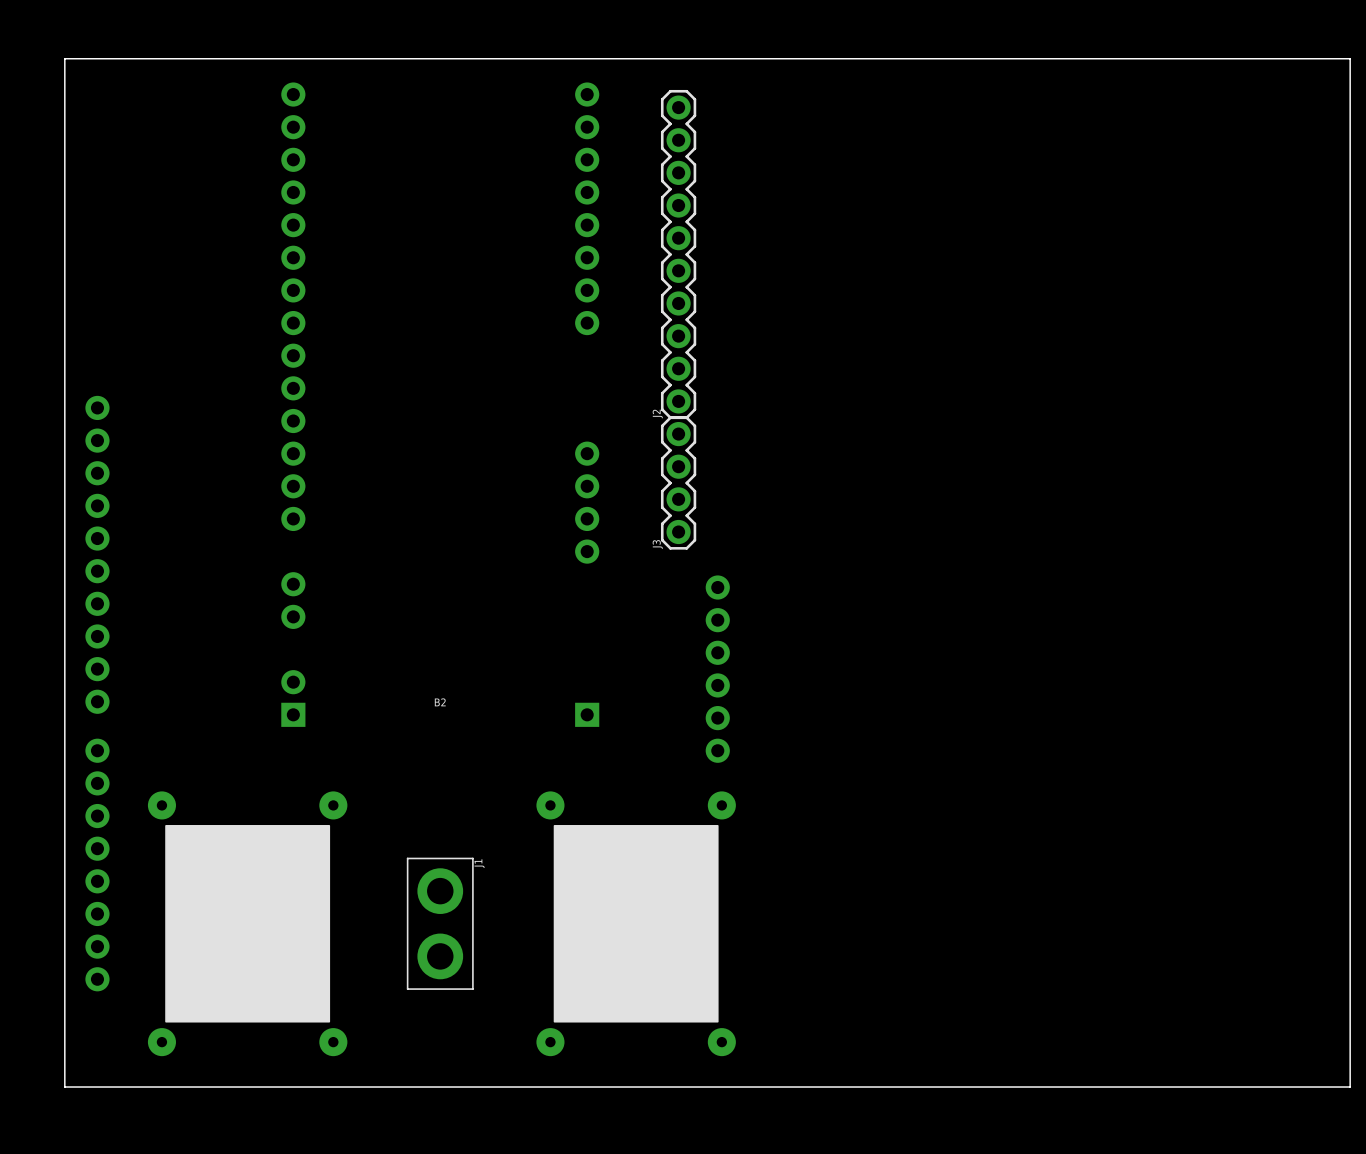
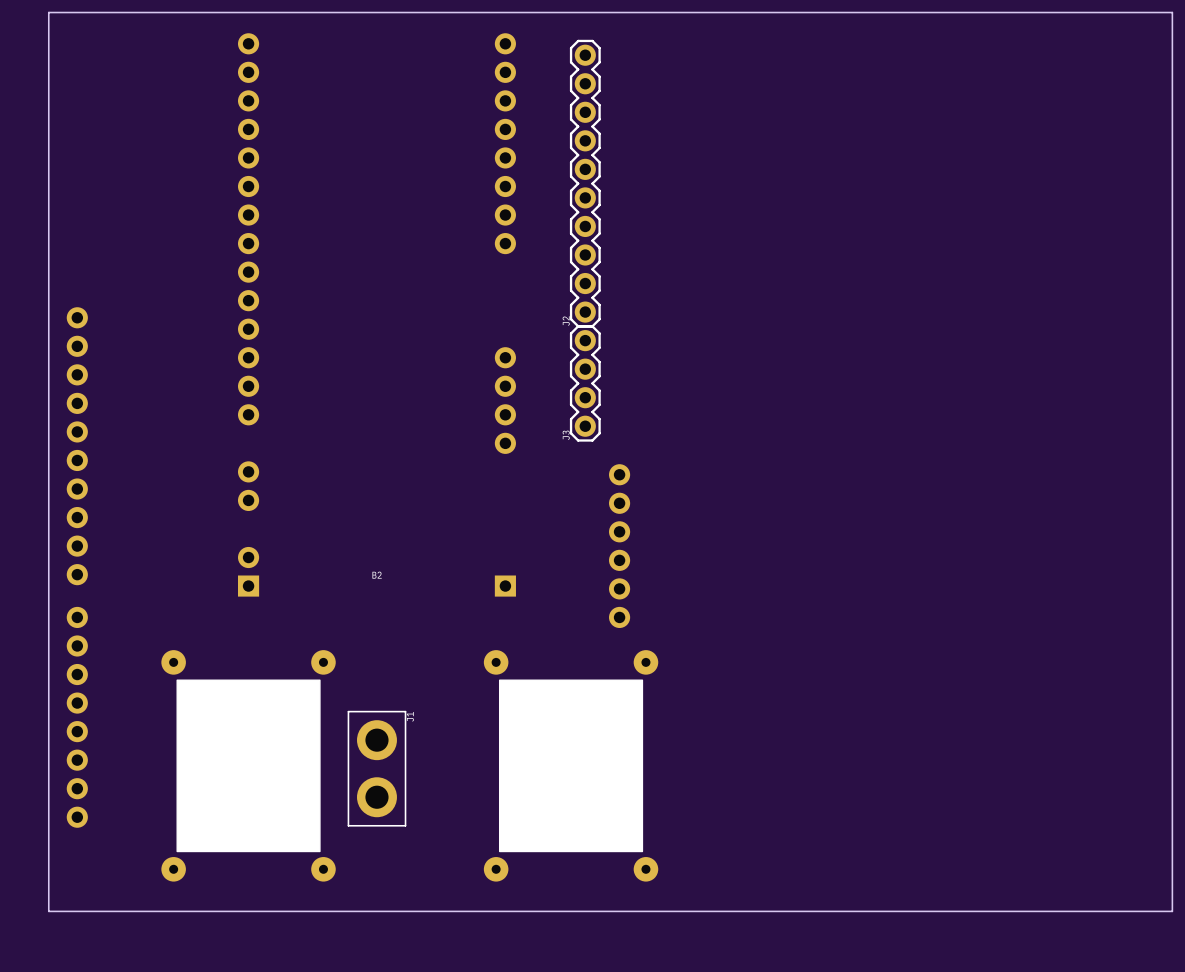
part position: (247, 923) -> (248, 765)
part position: (636, 923) -> (571, 765)

